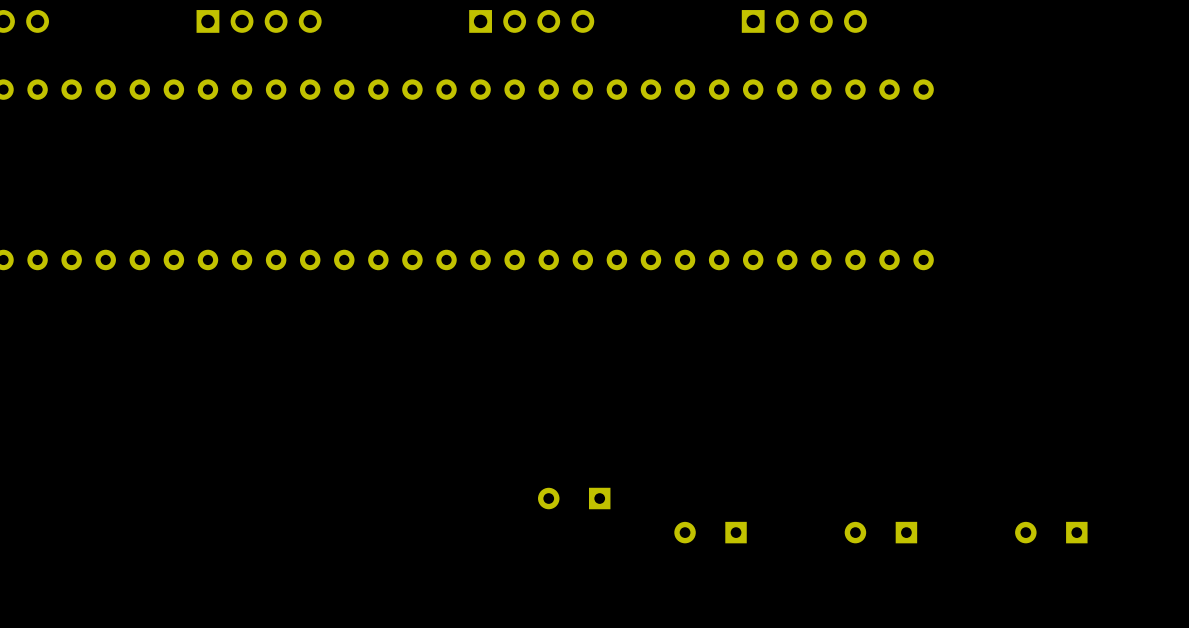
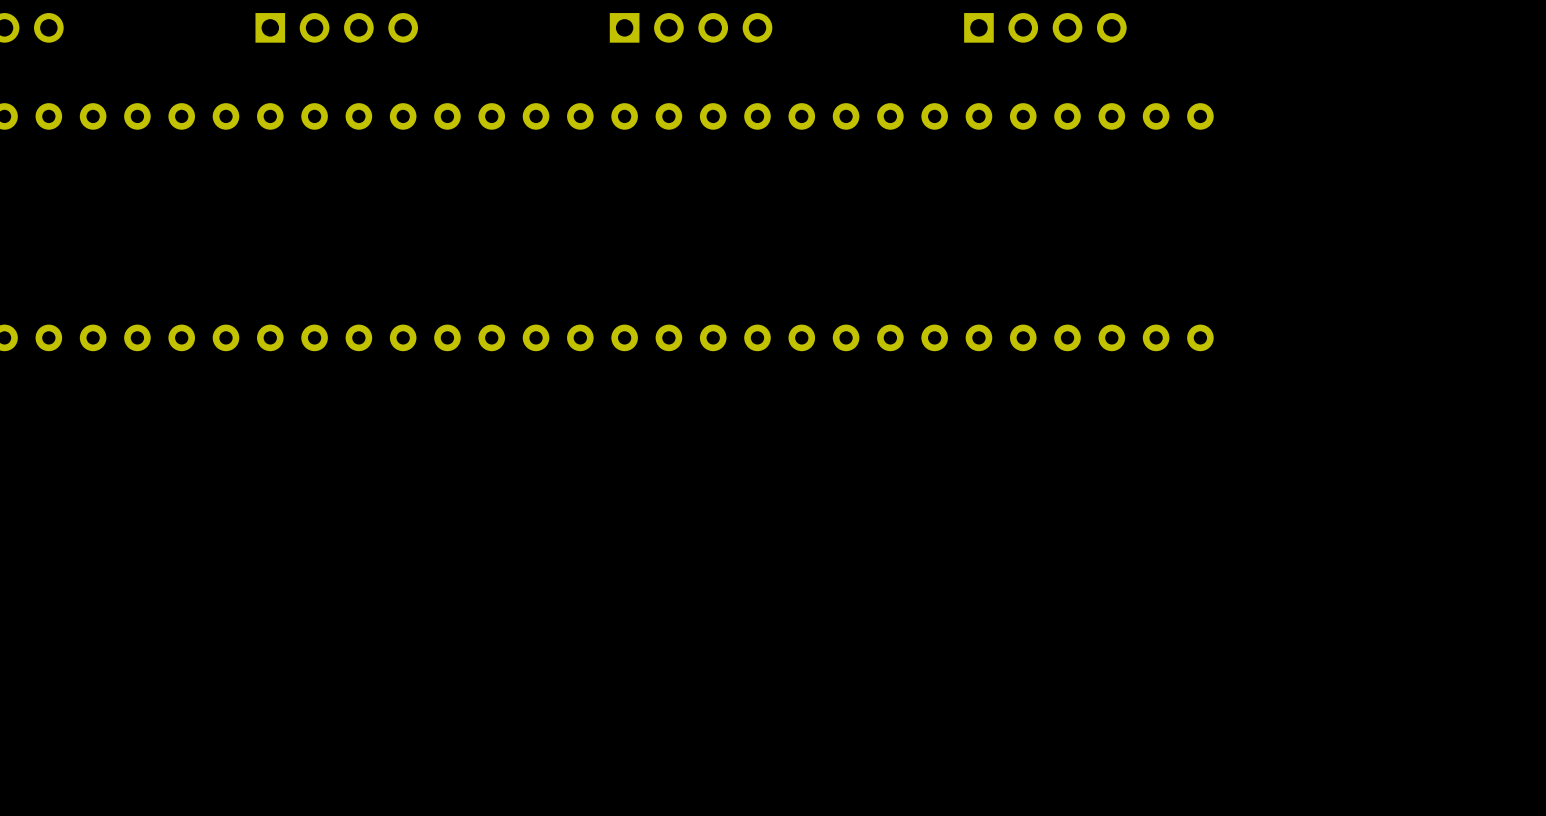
part: (574, 498) -> none
part: (710, 532) -> none
part: (880, 532) -> none
part: (1051, 532) -> none

